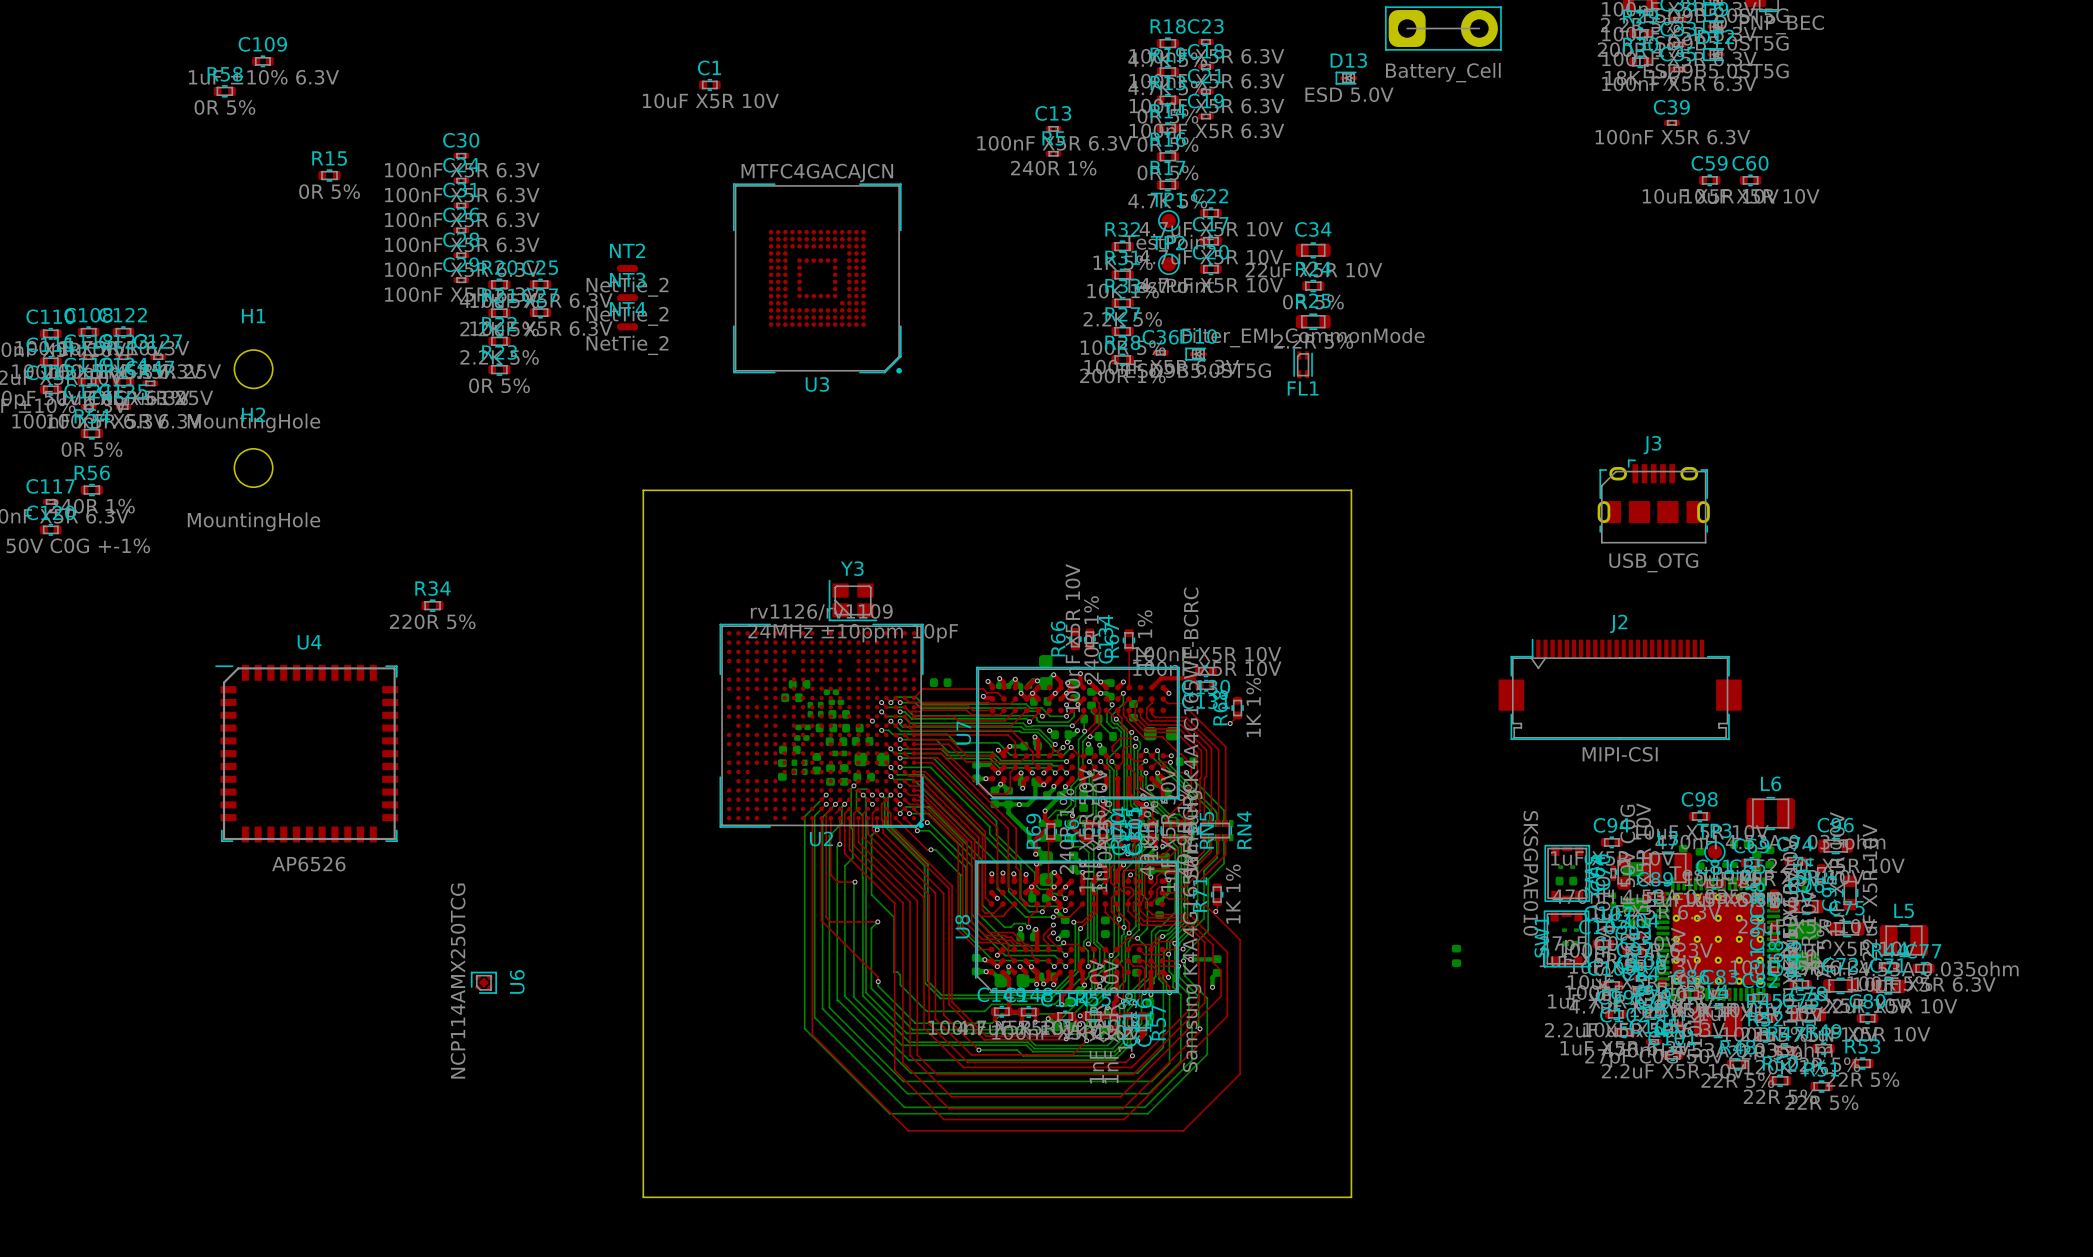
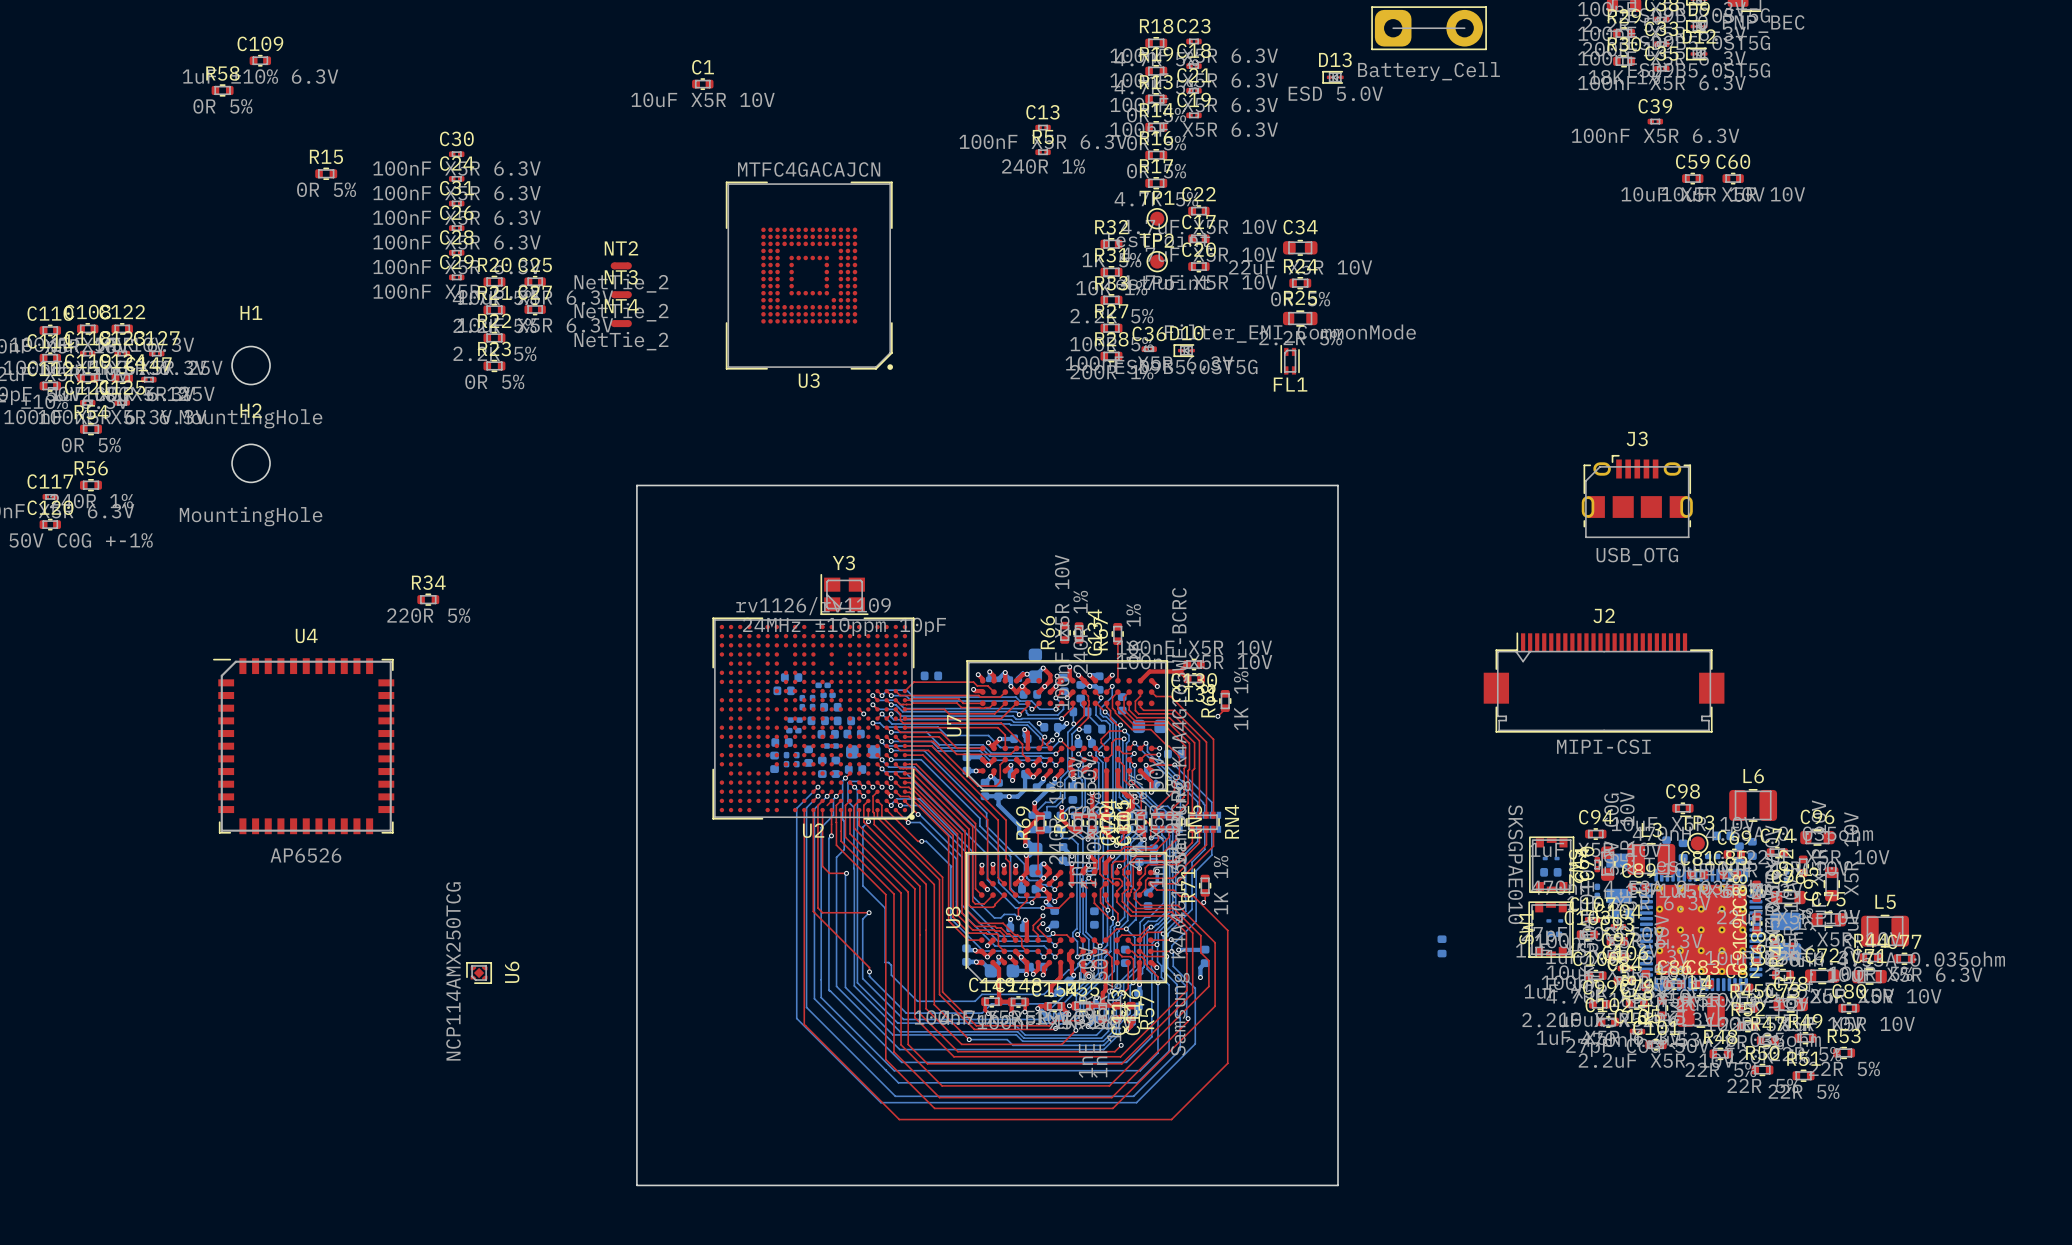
bottom track: (881, 795) (884, 798) (884, 826) (924, 865) (924, 982) (940, 998) (1051, 998) (1078, 971) (1078, 930) (1080, 928) -> none
bottom track: (890, 795) (887, 798) (887, 824) (927, 864) (927, 981) (941, 995) (1050, 995) (1075, 969) (1075, 923) (1073, 922) -> none
top track: (1097, 895) (1097, 911) (1080, 928) -> (1086, 887) (1087, 888)
top track: (1094, 904) (1094, 910) (1082, 922) (1073, 922) -> none
via: (1073, 922) -> none
via: (1080, 928) -> none

